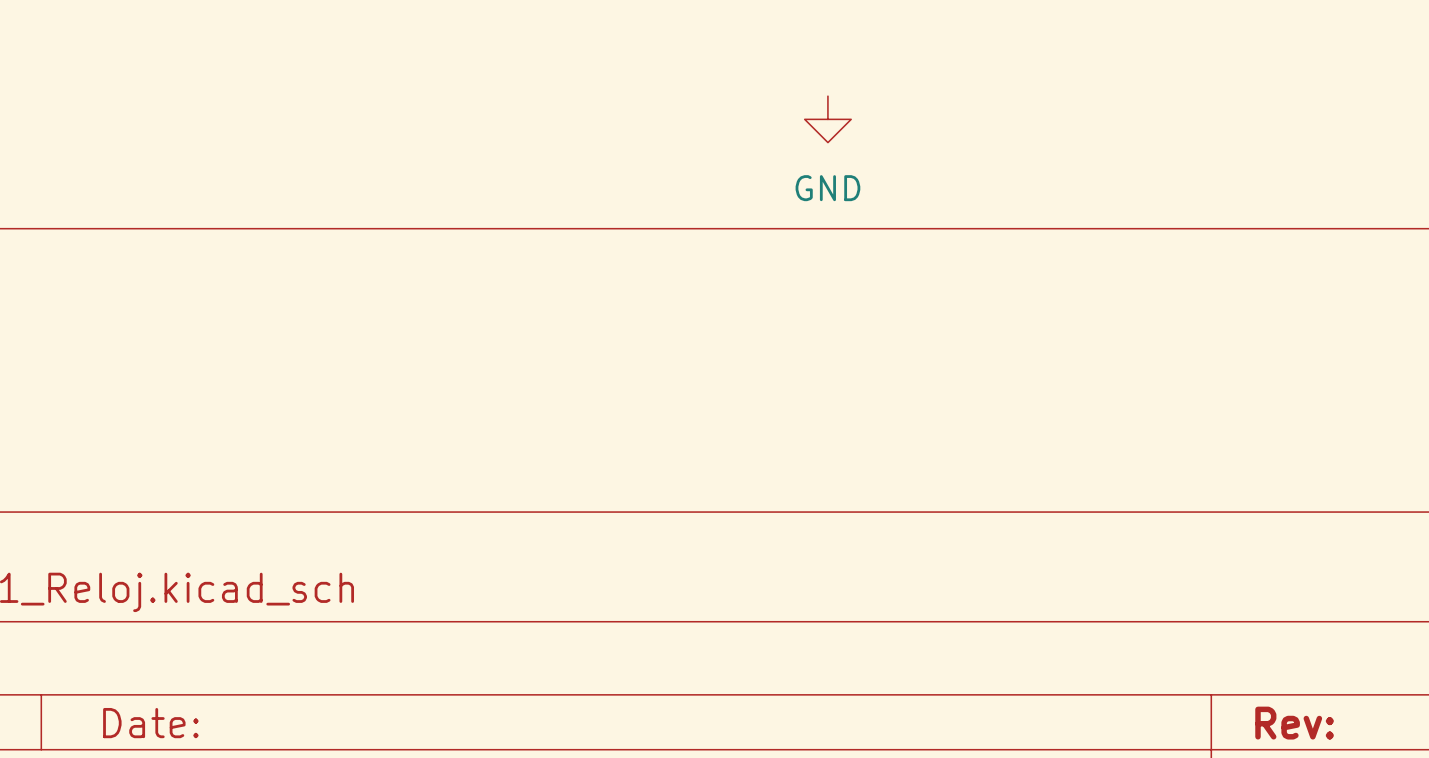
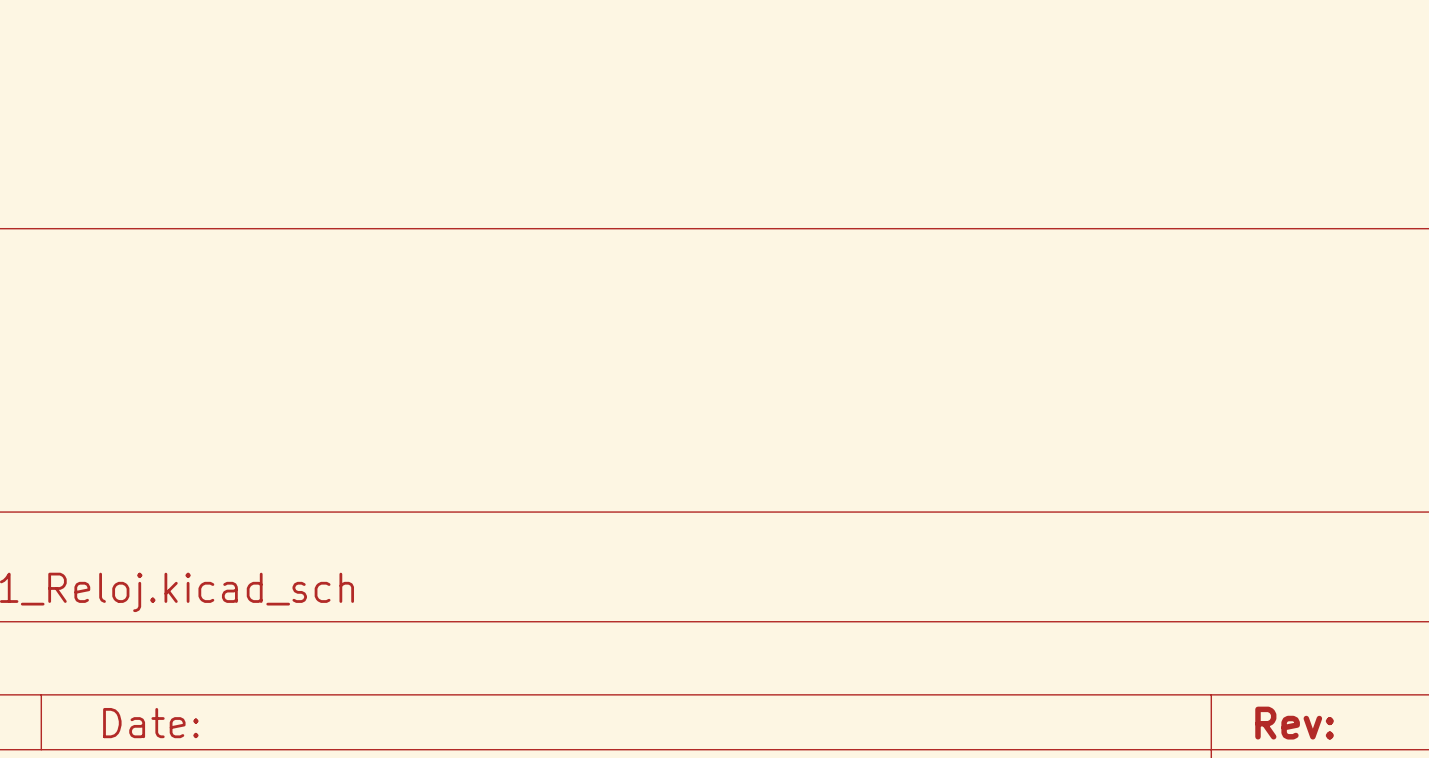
power symbol: GND (827, 119) -> none

